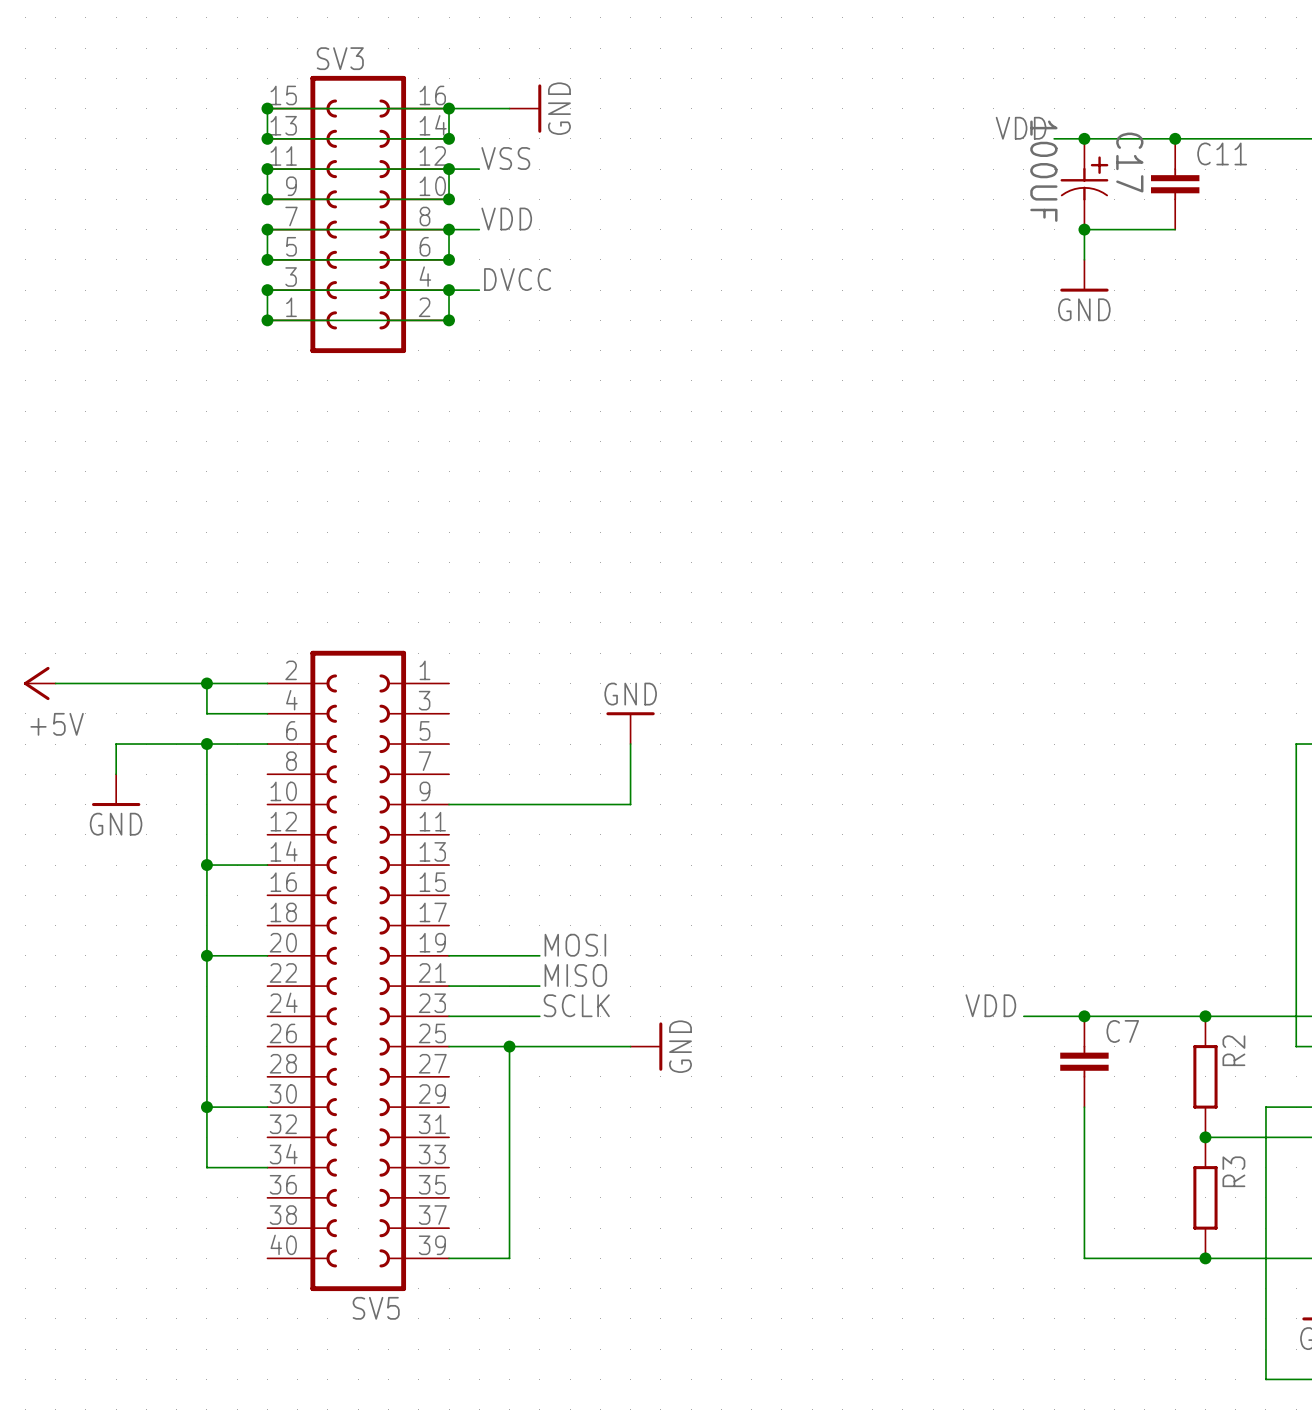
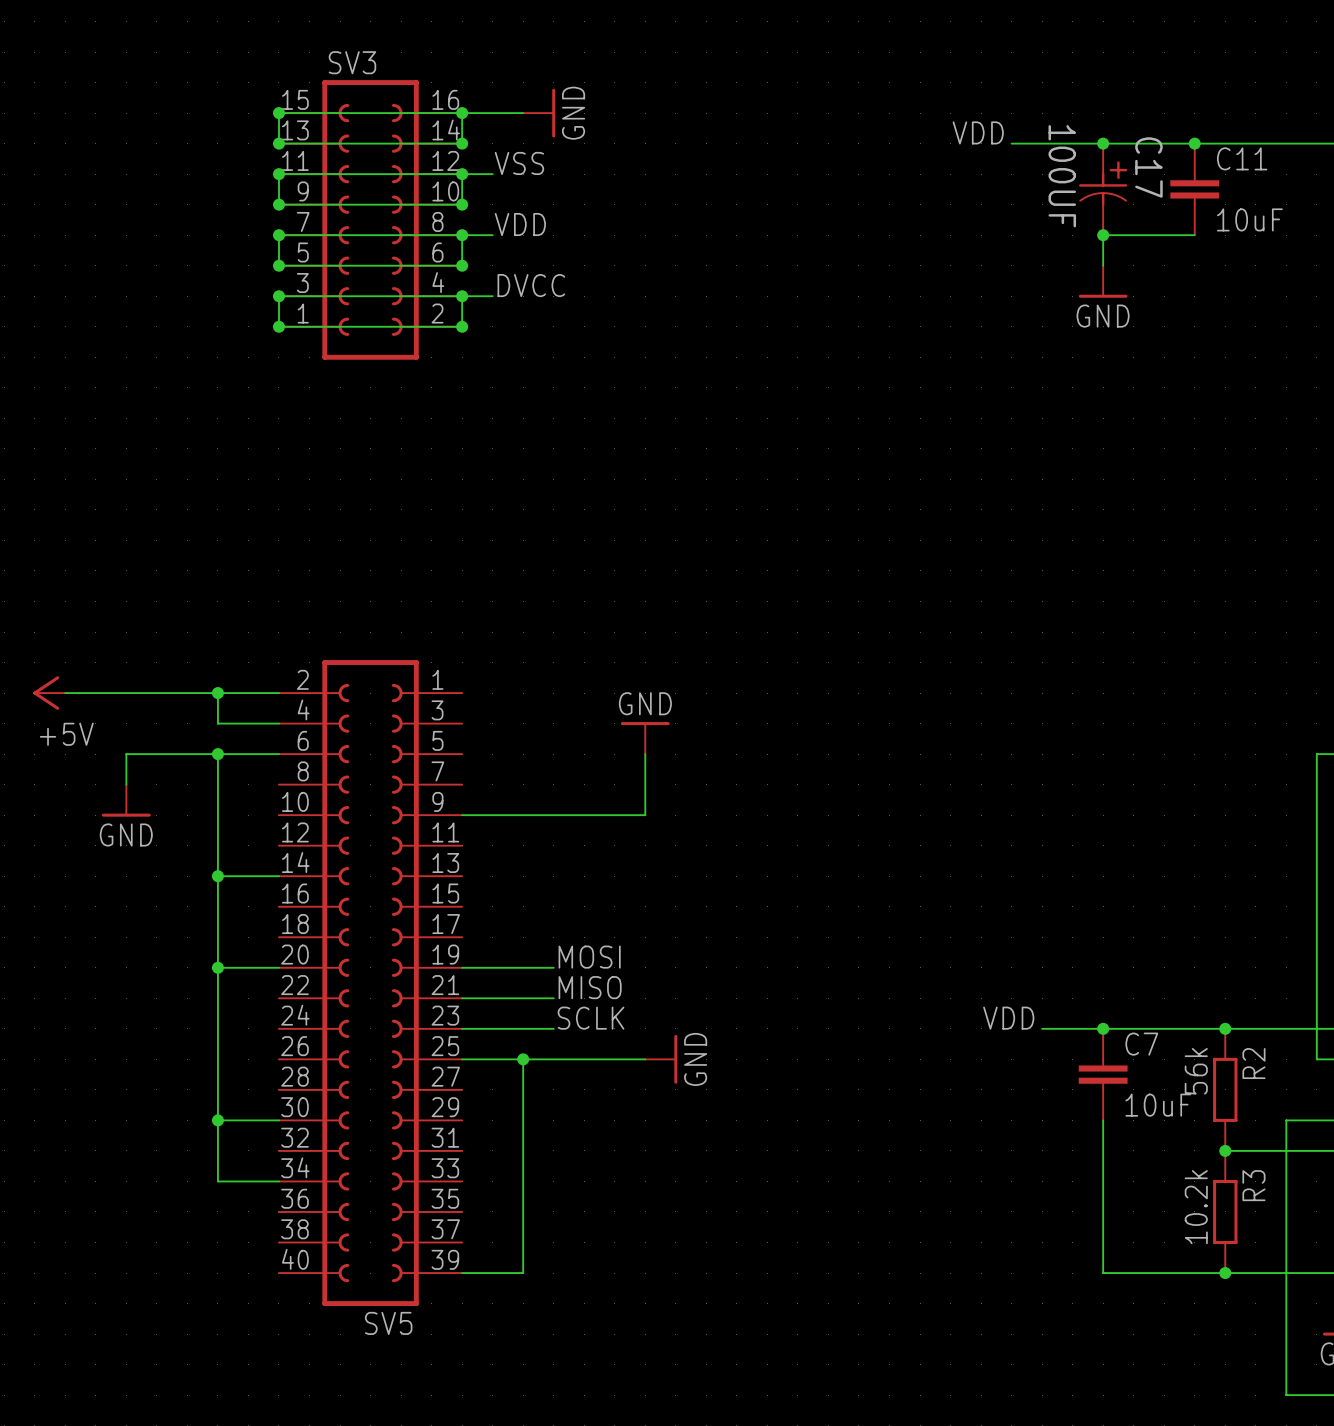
label position: VDD (1021, 128) -> VDD (978, 132)
wire: none -> (1011, 143) (1072, 143)
C11 value: none -> 10uF (1249, 219)
R2 value: none -> 56k (1196, 1071)
C7 value: none -> 10uF (1158, 1105)
R3 value: none -> 10.2k (1196, 1207)

